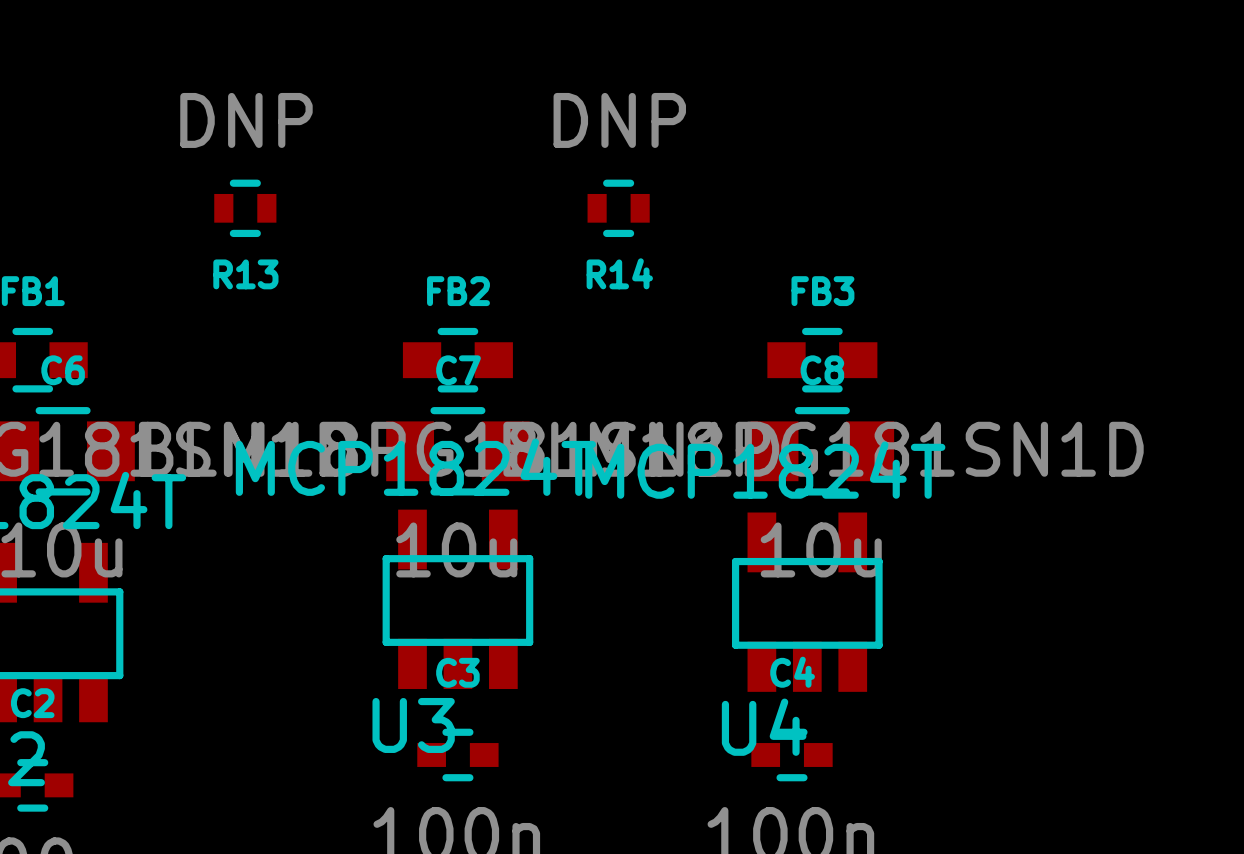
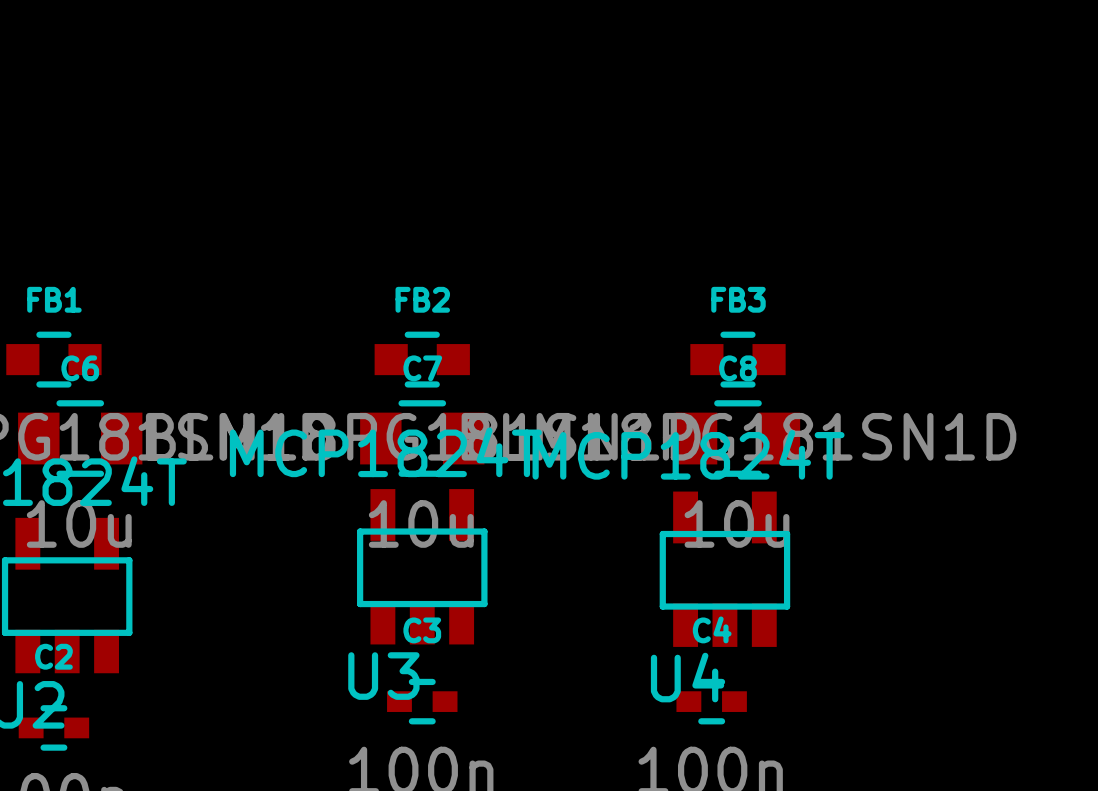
R13: DNP (245, 208) -> none
R14: DNP (618, 208) -> none

